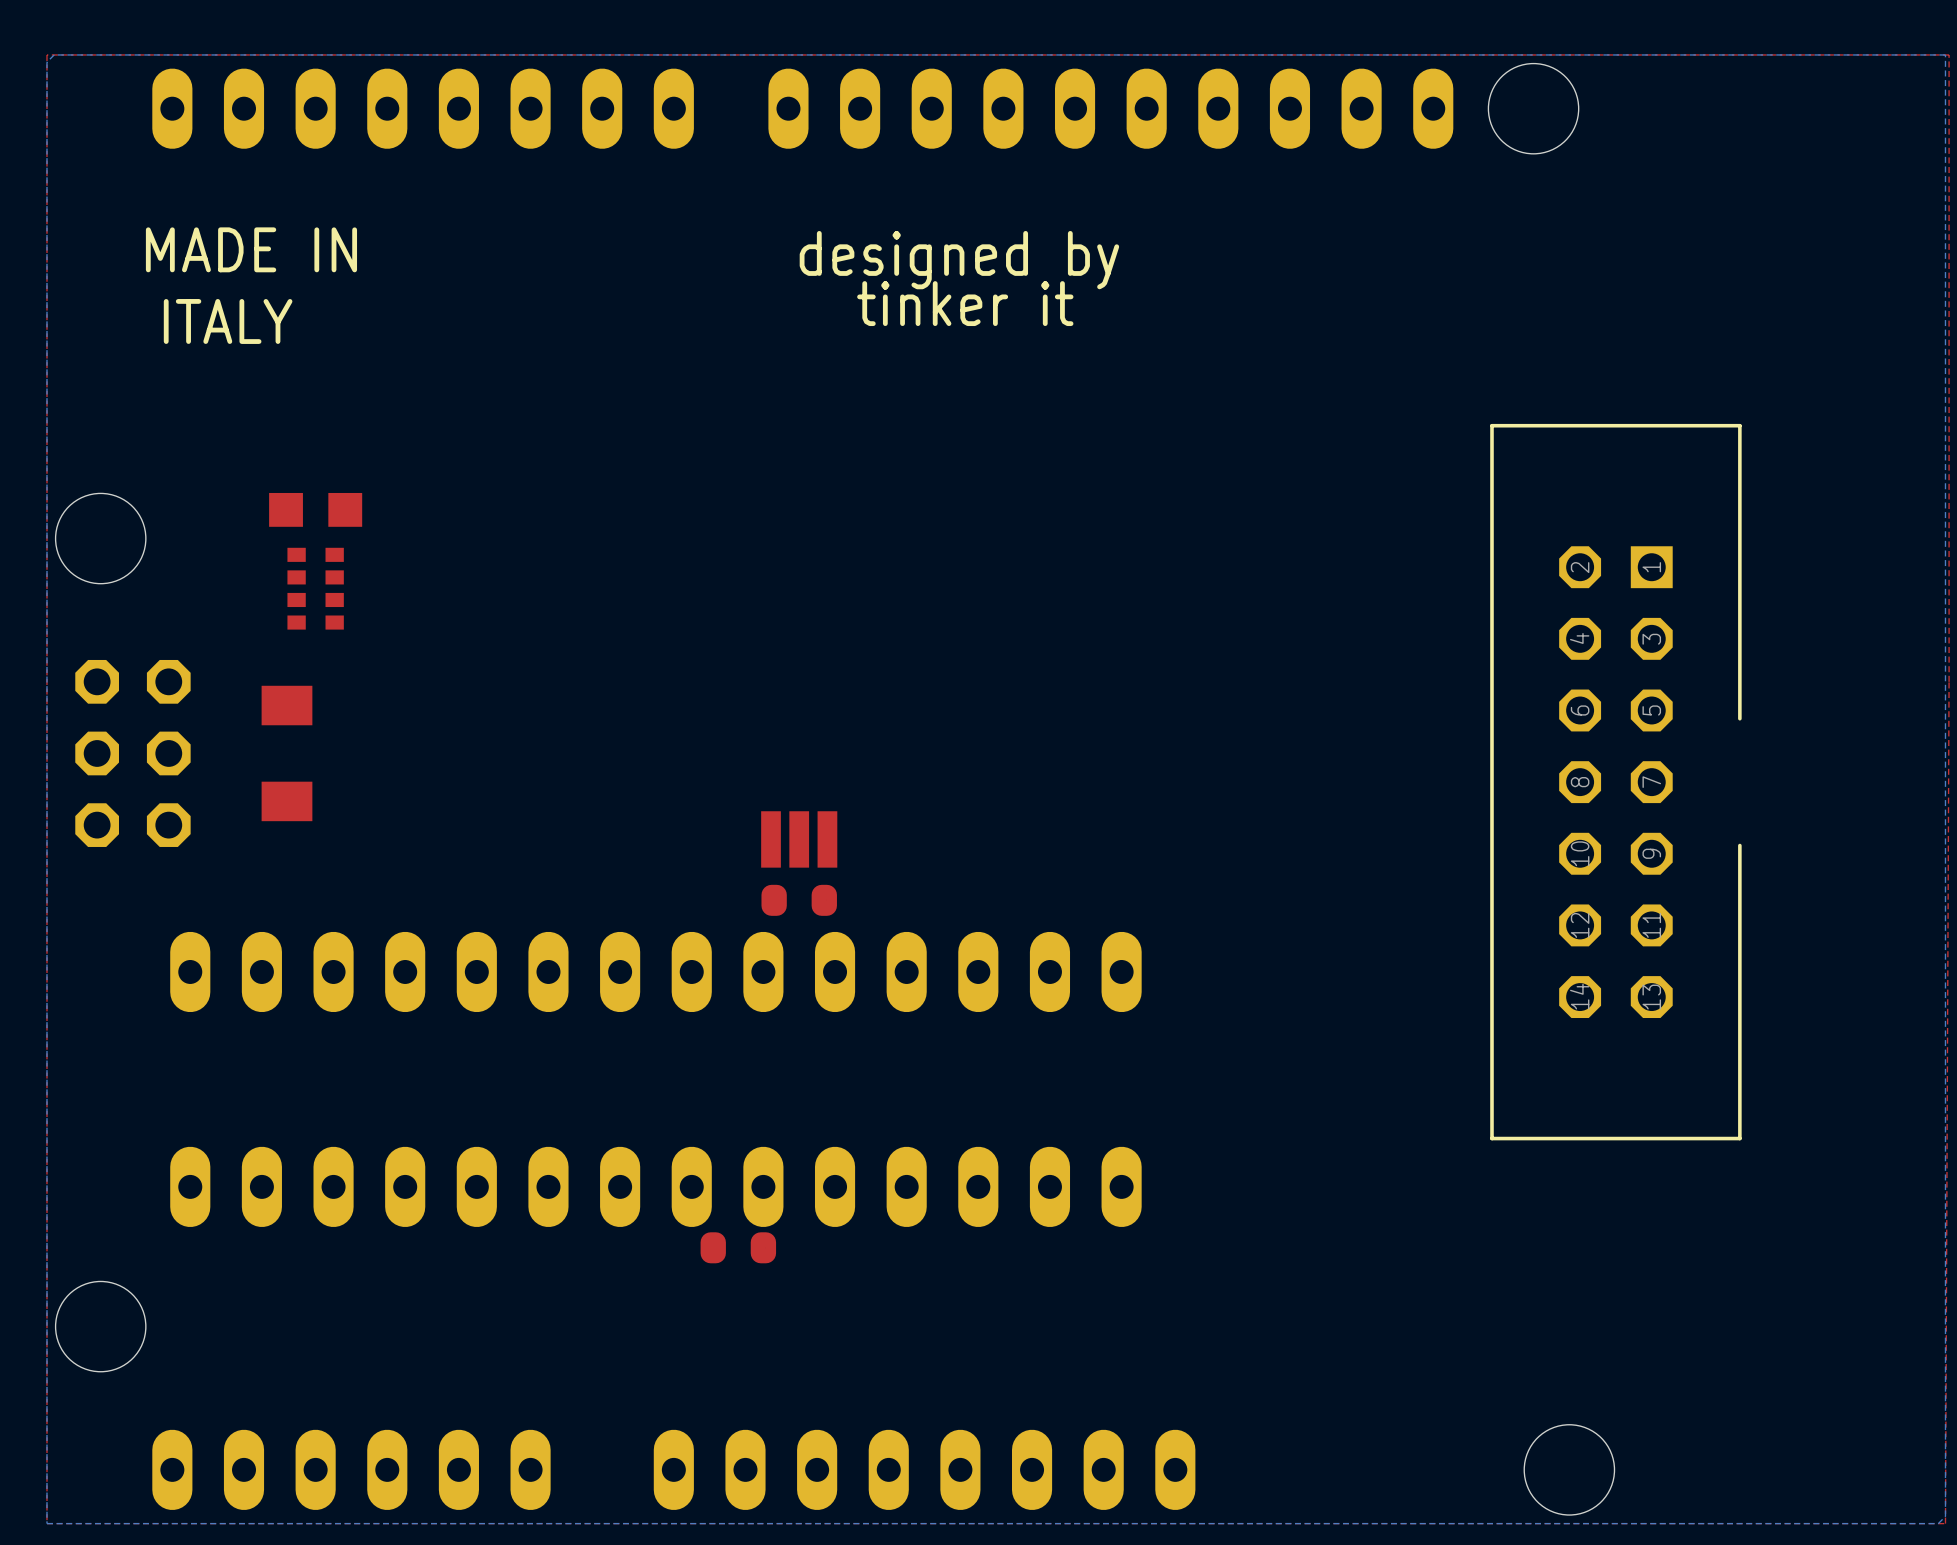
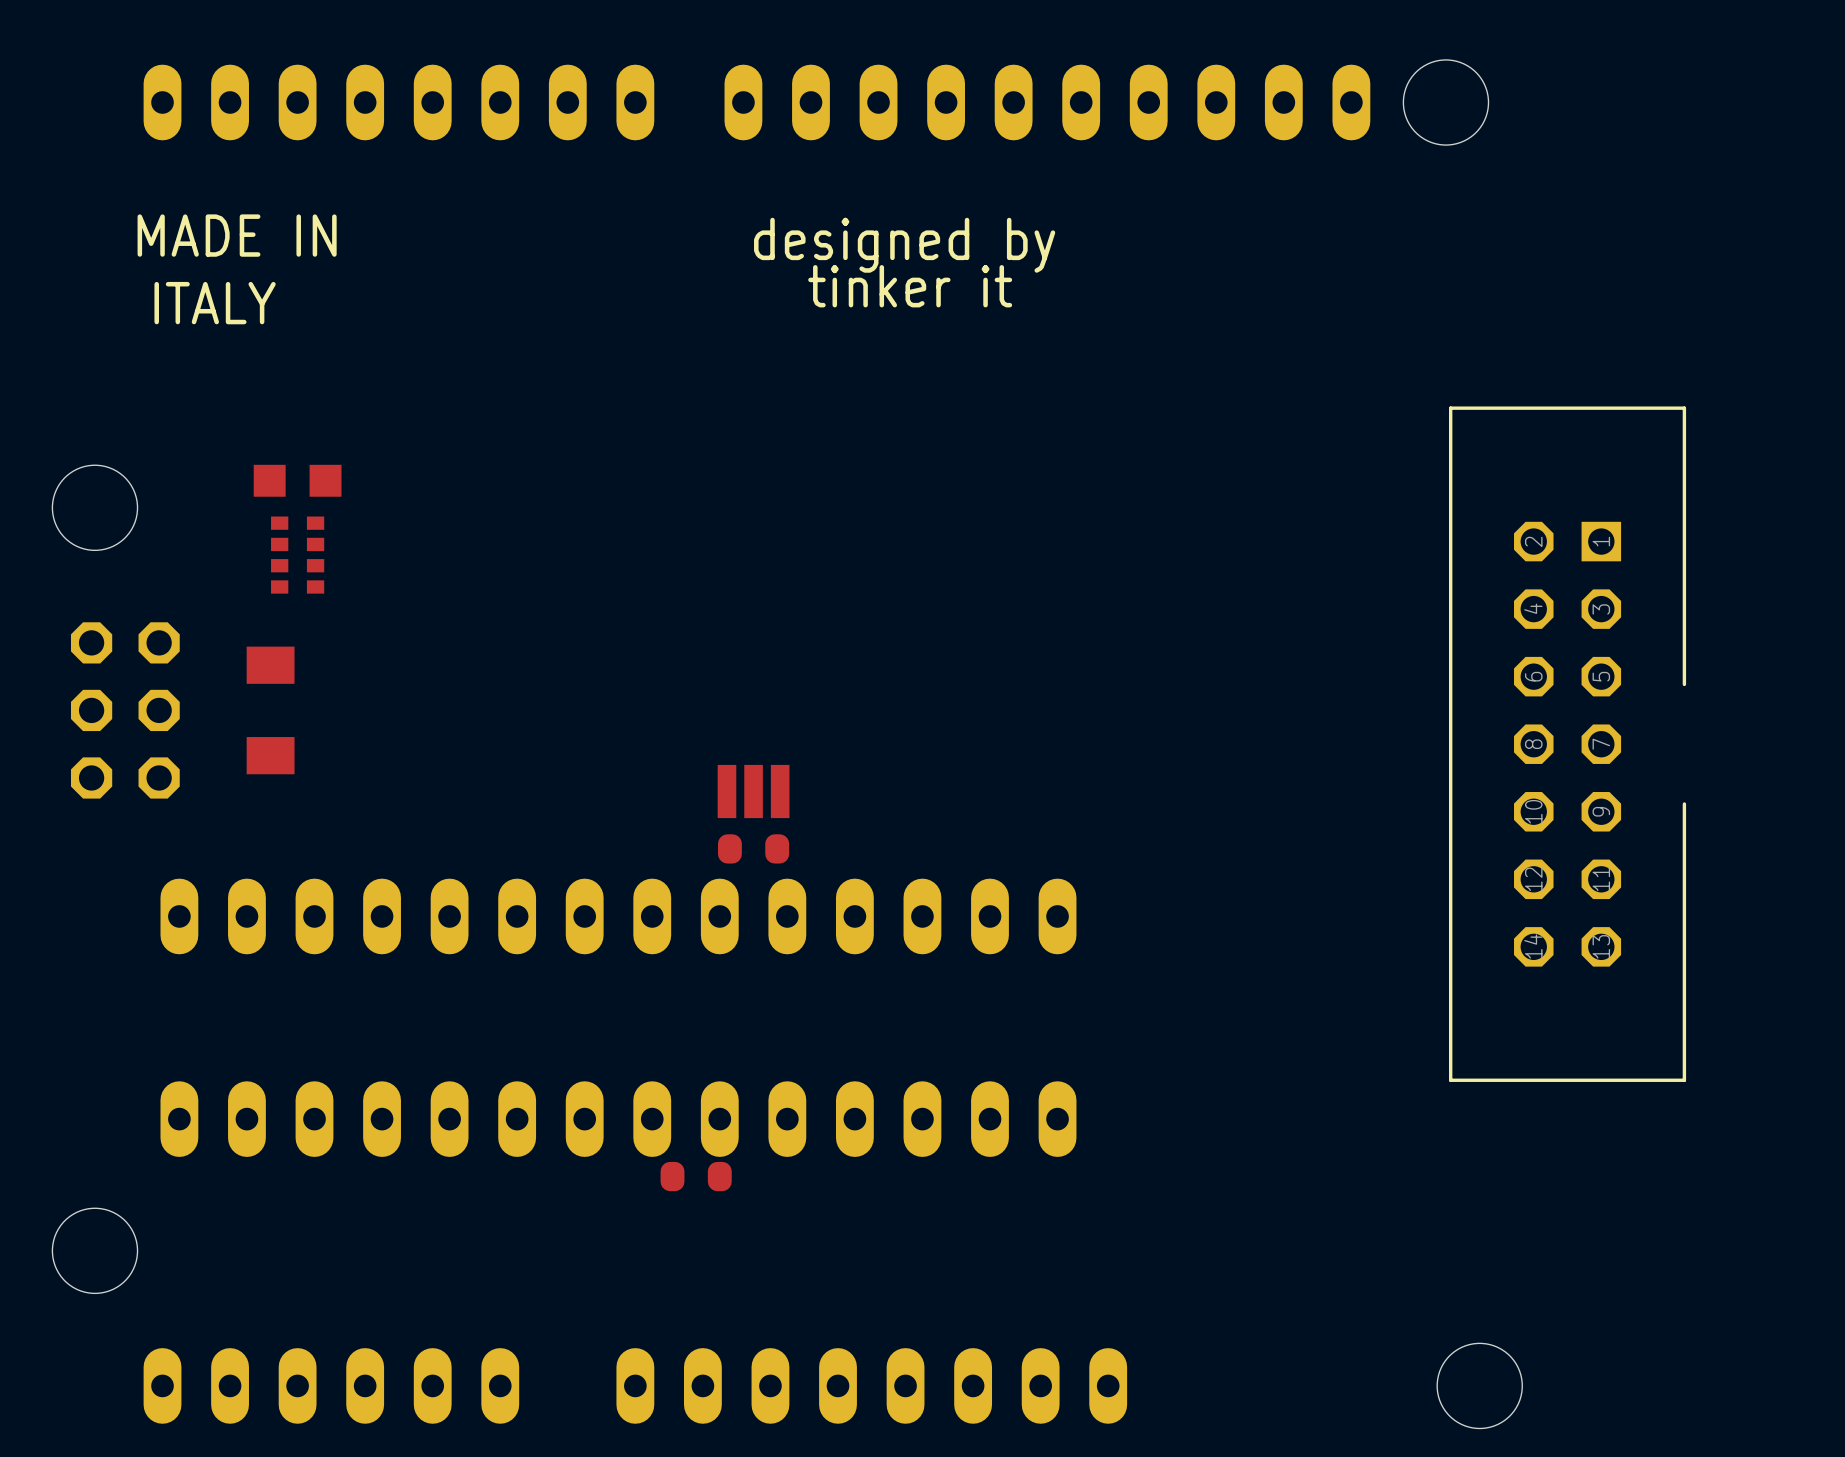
bottom zone outline: (1945, 54) (54, 54) (46, 62) (46, 1523) (1938, 1523) (1945, 1516) (1945, 54) -> none
top zone outline: (1949, 54) (46, 54) (46, 1523) (1945, 1523) (1949, 681) (1949, 54) -> none
part position: (1615, 782) -> (1567, 744)

